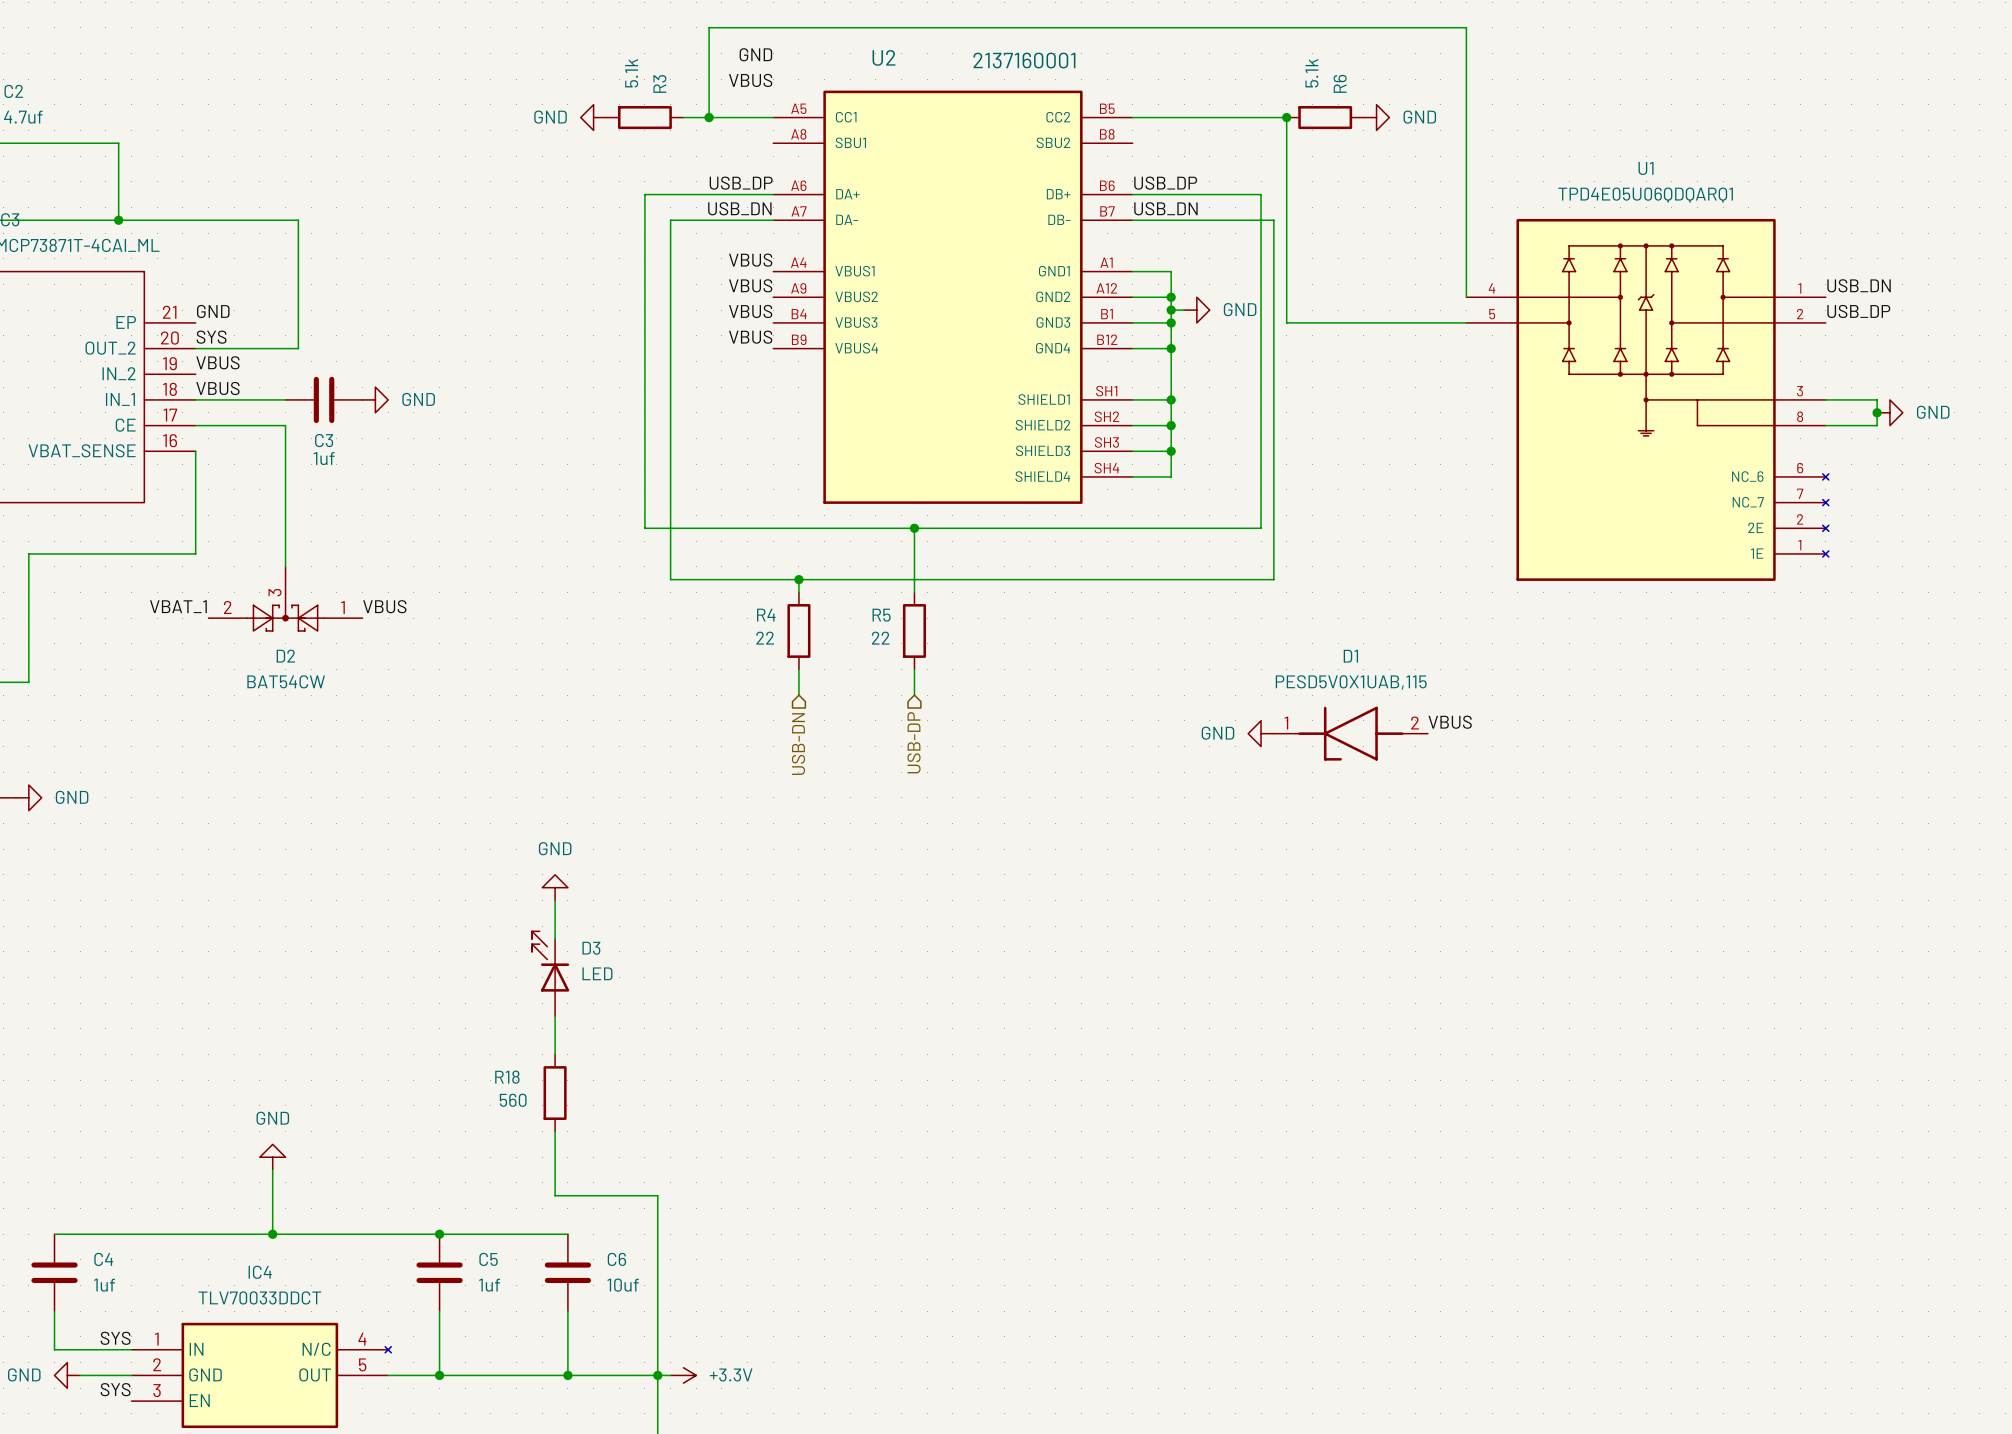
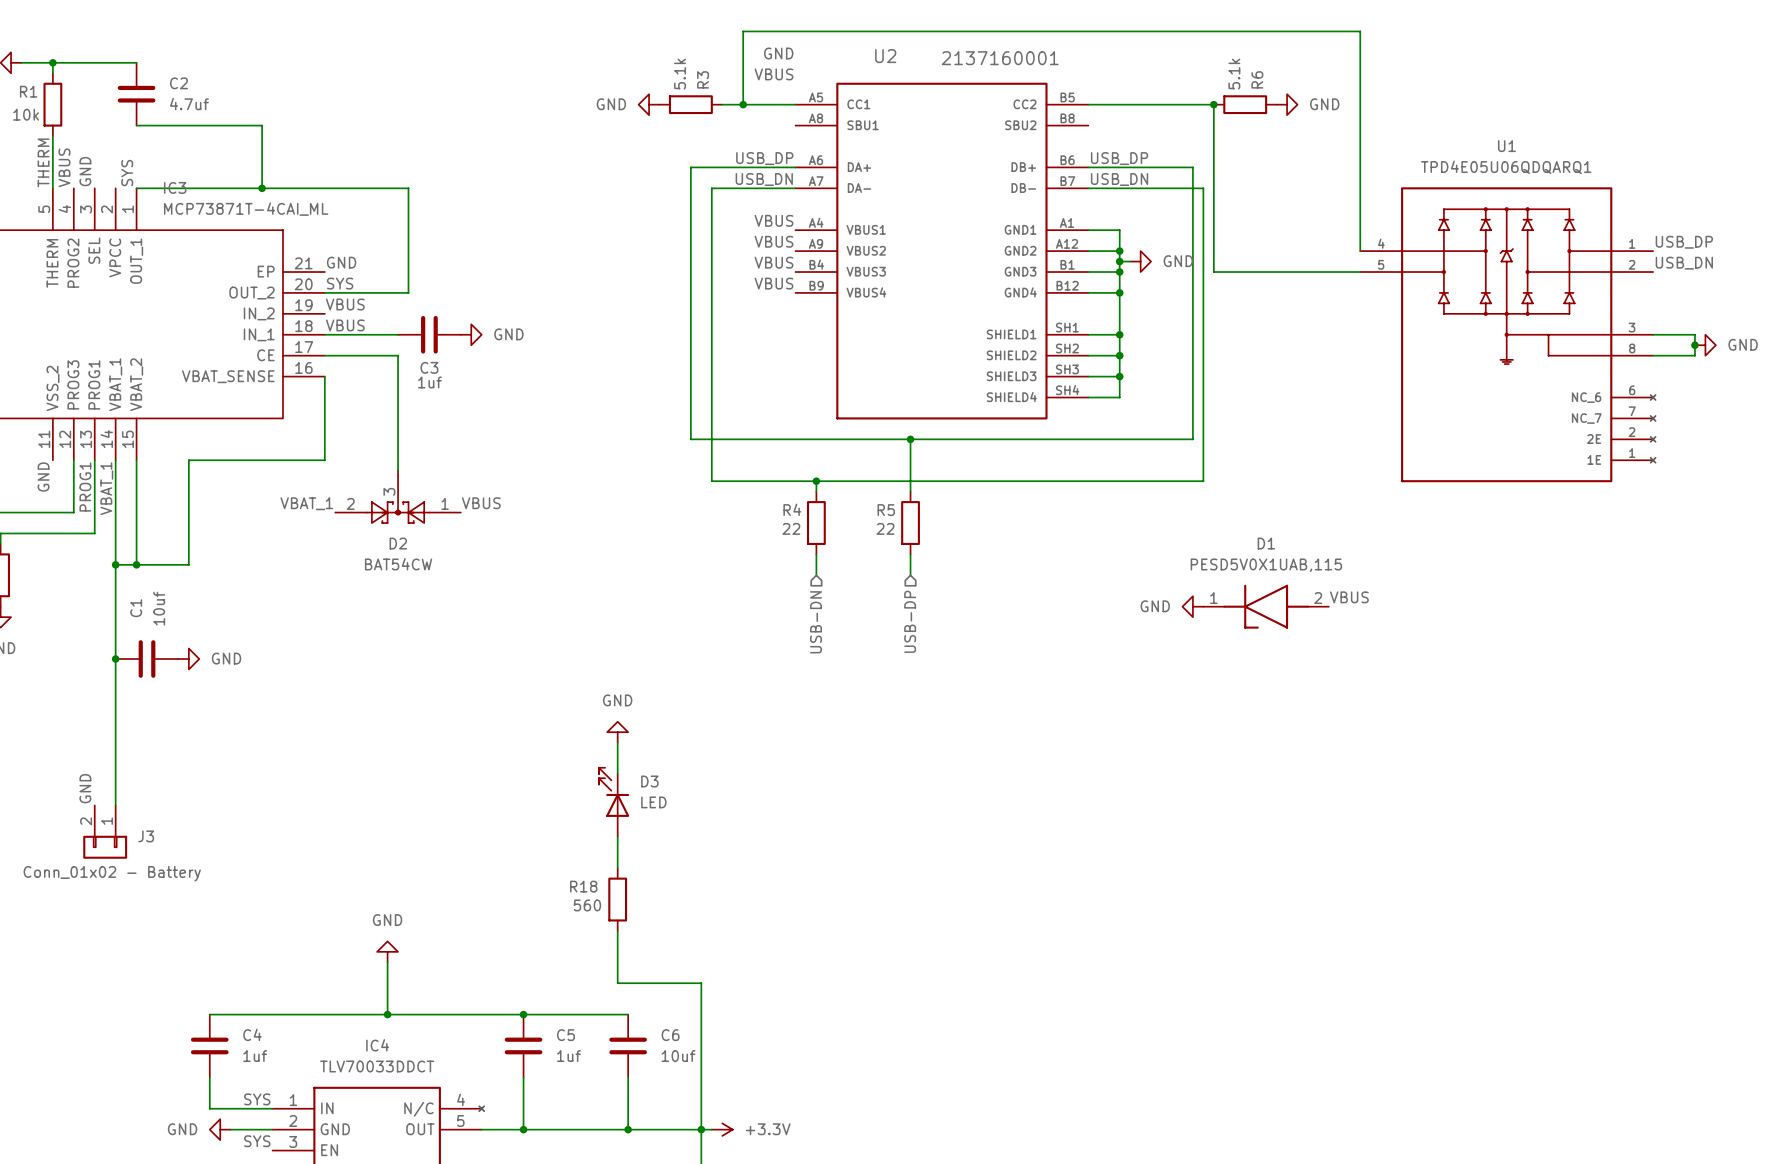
label: USB_DN (1859, 285) -> USB_DP (1684, 242)
label: USB_DP (1858, 311) -> USB_DN (1684, 263)

